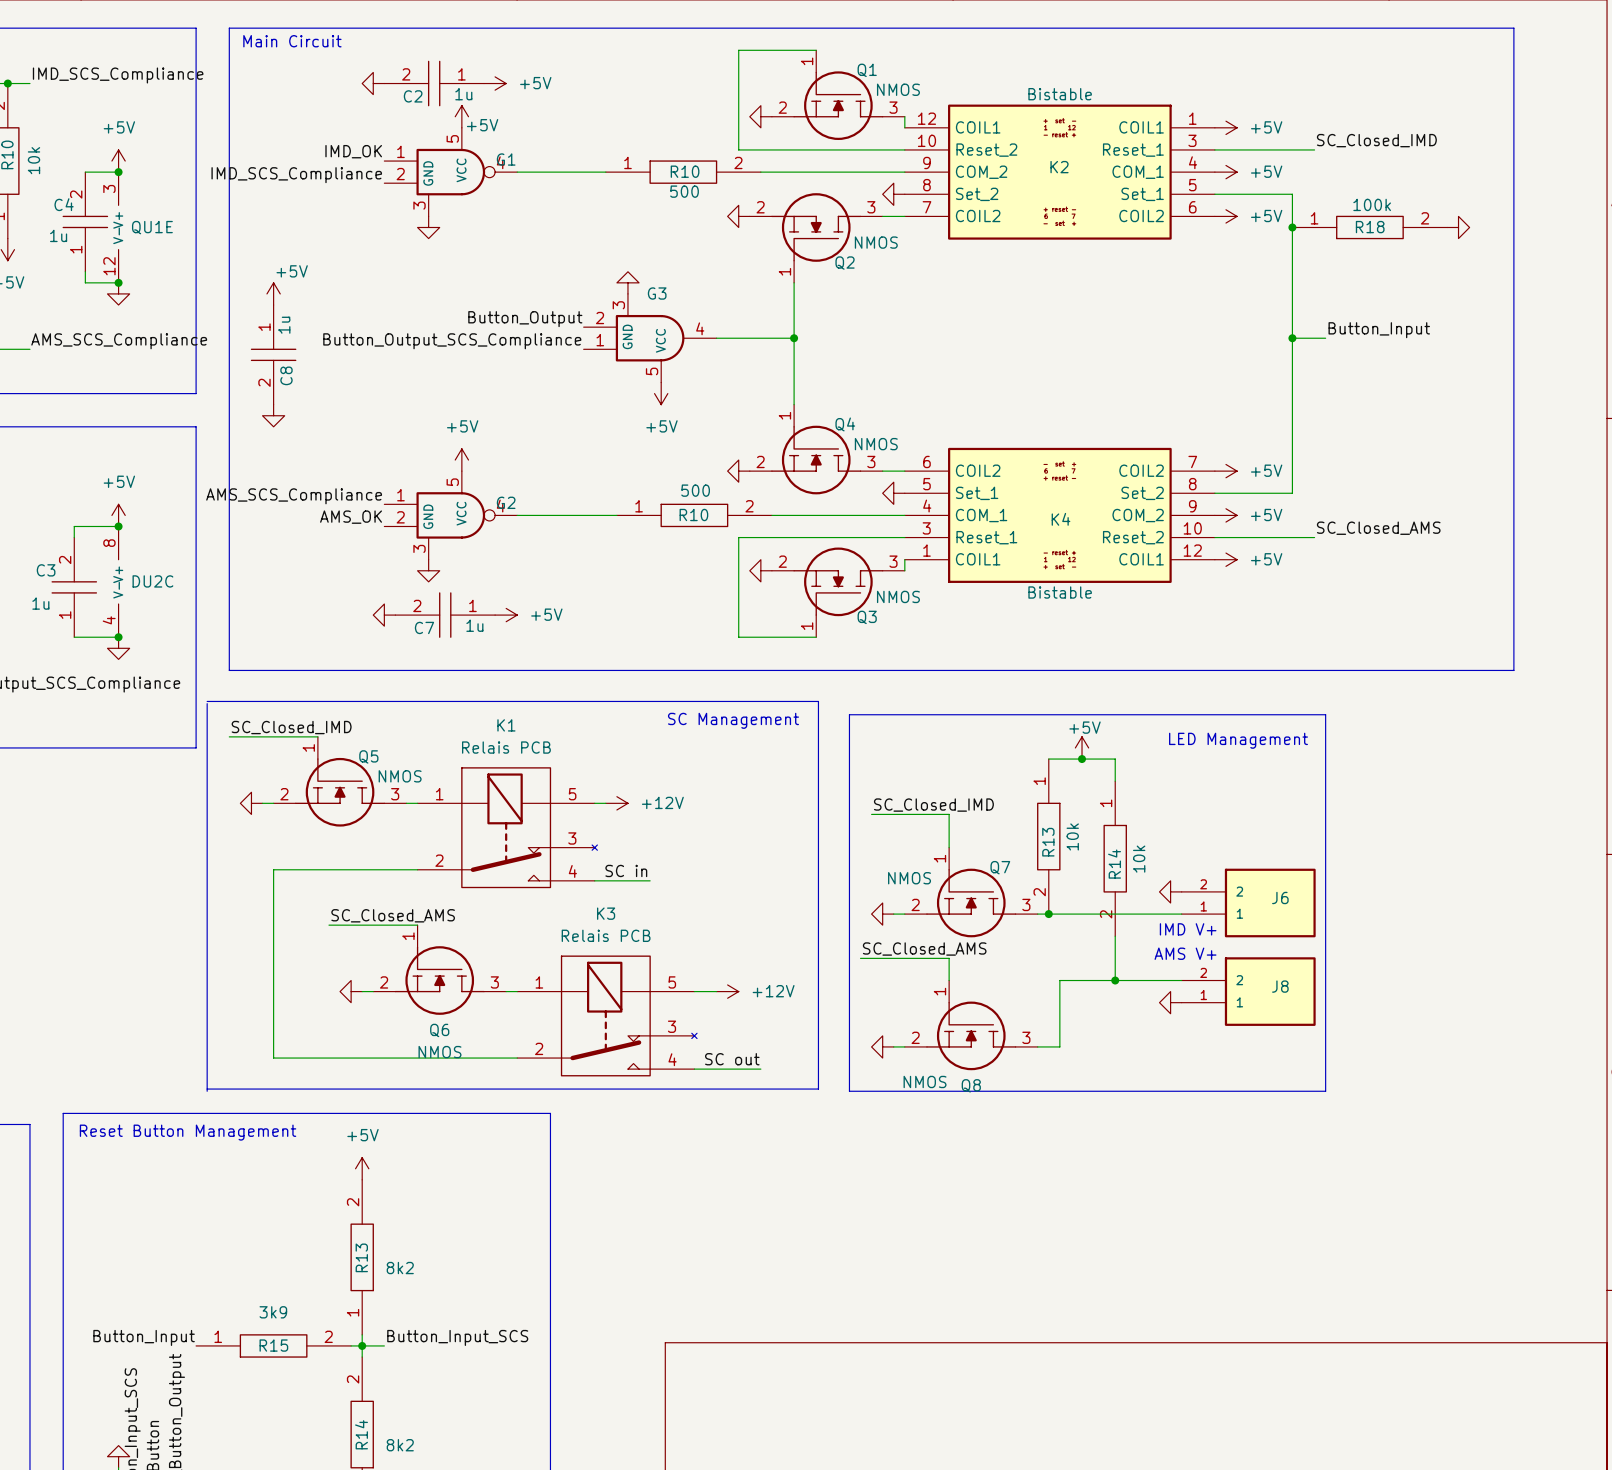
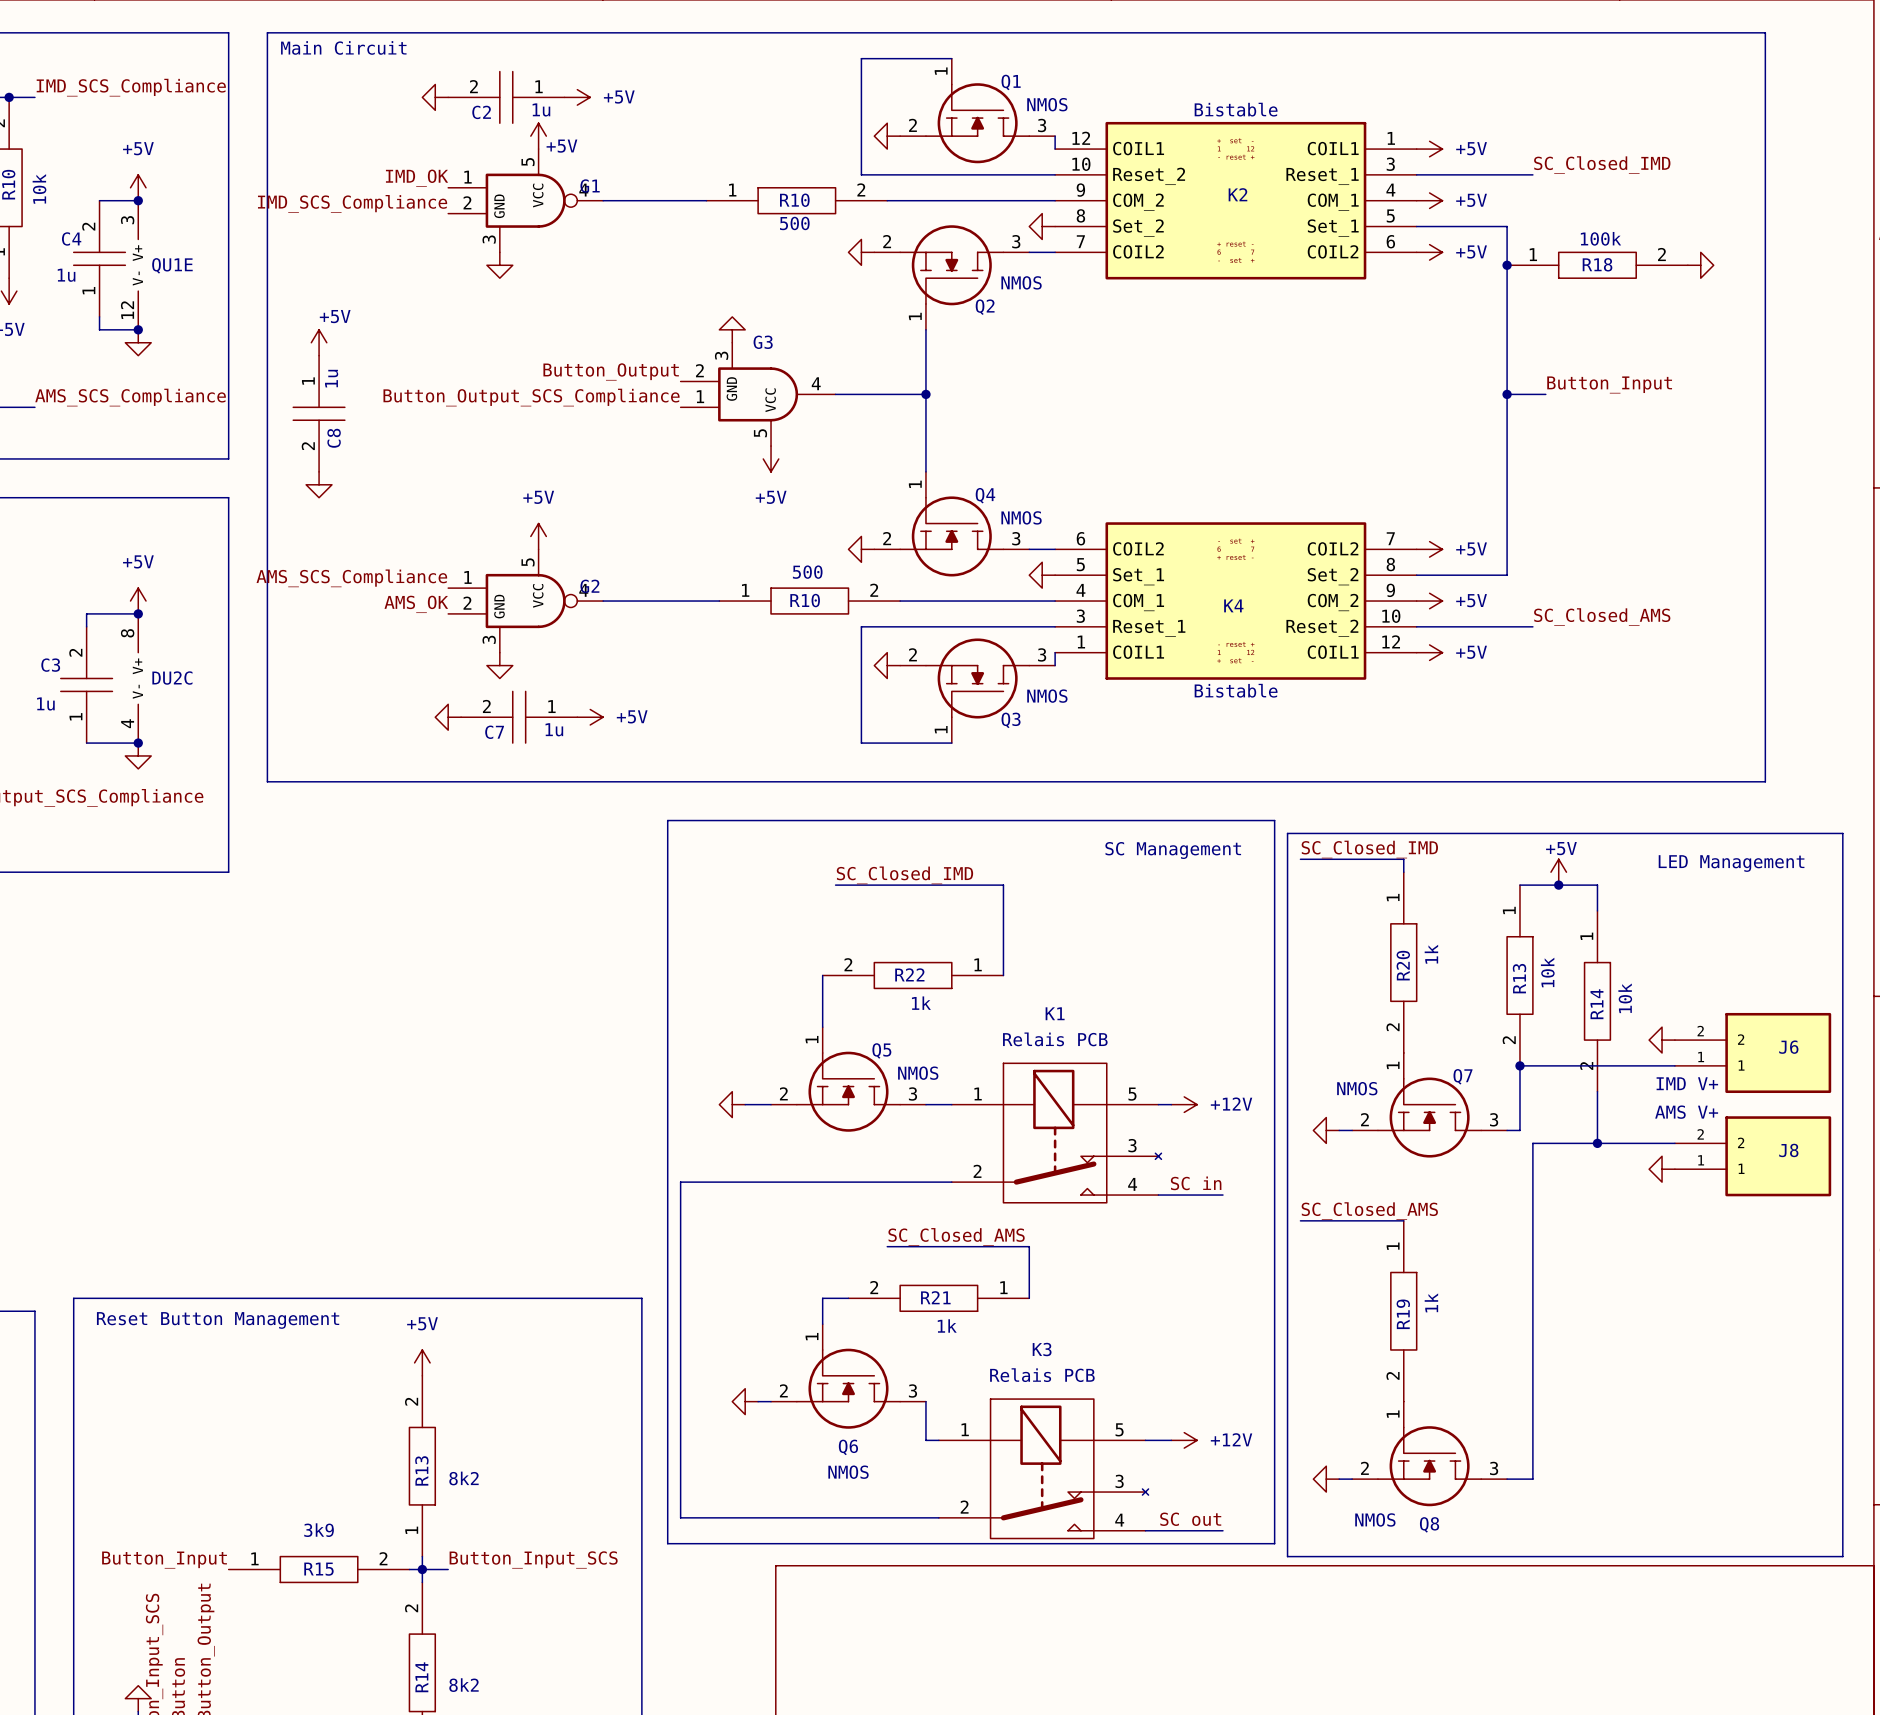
line: (207, 701) (818, 701) (818, 1089) (207, 1089) -> none
line: (207, 703) (207, 1091) -> none
line: none -> (667, 820) (1274, 820) (1274, 1543) (667, 1543) (667, 820)
line: (1104, 714) (849, 714) (849, 1091) (1325, 1091) (1325, 714) -> (1287, 833) (1287, 1556) (1842, 1556) (1842, 833) (1545, 833)
text: SC Management (733, 720) -> none
label: SC_Closed_IMD (291, 727) -> none
label: none -> SC_Closed_IMD (1369, 849)
text: none -> SC Management (1173, 850)
wire: (229, 736) (317, 736) -> none
wire: none -> (1300, 859) (1403, 859) (1403, 872)
text: LED Management (1238, 740) -> none
text: none -> LED Management (1731, 863)
power symbol: +5V (1082, 747) -> none
power symbol: none -> +5V (1558, 872)
label: none -> SC_Closed_IMD (904, 875)
wire: none -> (835, 885) (1003, 885) (1003, 975)
wire: (1048, 759) (1115, 759) (1115, 781) -> none
junction: (1082, 759) -> none
wire: none -> (1519, 885) (1597, 885) (1597, 910)
junction: none -> (1558, 885)
Q5 position: (340, 781) -> (848, 1079)
power symbol: (251, 803) -> none
wire: (262, 803) (273, 803) -> none
wire: (406, 803) (417, 803) -> none
wire: (594, 803) (605, 803) -> none
power symbol: +12V (616, 803) -> none
label: SC_Closed_IMD (933, 805) -> none
wire: (871, 814) (949, 814) (949, 847) -> none
R20: none -> 1k (1403, 962)
K1 position: (507, 827) -> (1056, 1133)
wire: none -> (822, 975) (822, 1027)
R22: none -> 1k (913, 975)
R13: 10k (1048, 836) -> none
R13: none -> 10k (1519, 975)
R14: 10k (1115, 858) -> none
R14: none -> 10k (1597, 1001)
wire: (417, 869) (273, 869) (273, 1058) (517, 1058) -> none
label: SC in (626, 870) -> none
wire: (594, 880) (650, 880) -> none
power symbol: (1170, 891) -> none
power symbol: none -> (1662, 1040)
Q7 position: (971, 892) -> (1429, 1105)
J6 position: (1248, 903) -> (1753, 1052)
power symbol: (882, 914) -> none
wire: (893, 914) (904, 914) -> (1158, 1104) (1171, 1104)
wire: (1037, 914) (1181, 914) -> none
junction: (1048, 914) -> none
junction: none -> (1519, 1065)
wire: none -> (1674, 1065) (1519, 1065) (1519, 1130) (1507, 1130)
label: SC_Closed_AMS (393, 915) -> none
wire: (328, 925) (417, 925) -> none
text: IMD V+ (1188, 929) -> none
text: none -> IMD V+ (1687, 1083)
wire: (1115, 936) (1115, 980) -> none
wire: none -> (1597, 1091) (1597, 1143)
power symbol: none -> (732, 1104)
wire: none -> (925, 1104) (951, 1104)
power symbol: none -> +12V (1184, 1104)
label: SC_Closed_AMS (924, 949) -> none
text: AMS V+ (1185, 953) -> none
text: none -> AMS V+ (1686, 1112)
wire: (860, 958) (949, 958) (949, 980) -> none
power symbol: none -> (1326, 1130)
wire: none -> (1339, 1130) (1352, 1130)
Q6 position: (439, 970) -> (848, 1376)
junction: (1115, 980) -> none
wire: (1181, 980) (1059, 980) (1059, 1046) (1037, 1046) -> none
junction: none -> (1597, 1143)
wire: none -> (1674, 1143) (1532, 1143) (1532, 1479) (1507, 1479)
power symbol: (351, 991) -> none
wire: (362, 991) (373, 991) -> none
wire: (506, 991) (517, 991) -> none
wire: (694, 991) (716, 991) -> (745, 1104) (771, 1104)
power symbol: +12V (727, 991) -> none
J8 position: (1248, 991) -> (1753, 1156)
power symbol: (1170, 1002) -> none
power symbol: none -> (1662, 1169)
wire: none -> (951, 1182) (680, 1182) (680, 1517) (938, 1517)
label: none -> SC in (1196, 1183)
K3 position: (607, 1015) -> (1043, 1468)
wire: none -> (1158, 1195) (1222, 1195)
Q8 position: (971, 1025) -> (1429, 1453)
label: none -> SC_Closed_AMS (1369, 1211)
power symbol: (882, 1046) -> none
wire: (893, 1046) (904, 1046) -> none
wire: none -> (1300, 1220) (1403, 1220)
label: SC out (732, 1059) -> SC_Closed_AMS (956, 1236)
wire: (694, 1069) (760, 1069) -> (1029, 1298) (1029, 1246) (887, 1246)
wire: none -> (848, 1298) (822, 1298) (822, 1324)
R21: none -> 1k (938, 1298)
R19: none -> 1k (1403, 1311)
power symbol: none -> (745, 1401)
wire: none -> (758, 1401) (771, 1401)
wire: none -> (925, 1401) (925, 1440) (938, 1440)
wire: none -> (1145, 1440) (1171, 1440)
power symbol: none -> +12V (1184, 1440)
power symbol: none -> (1326, 1479)
wire: none -> (1339, 1479) (1352, 1479)
label: none -> SC out (1190, 1519)
wire: none -> (1145, 1530) (1222, 1530)

